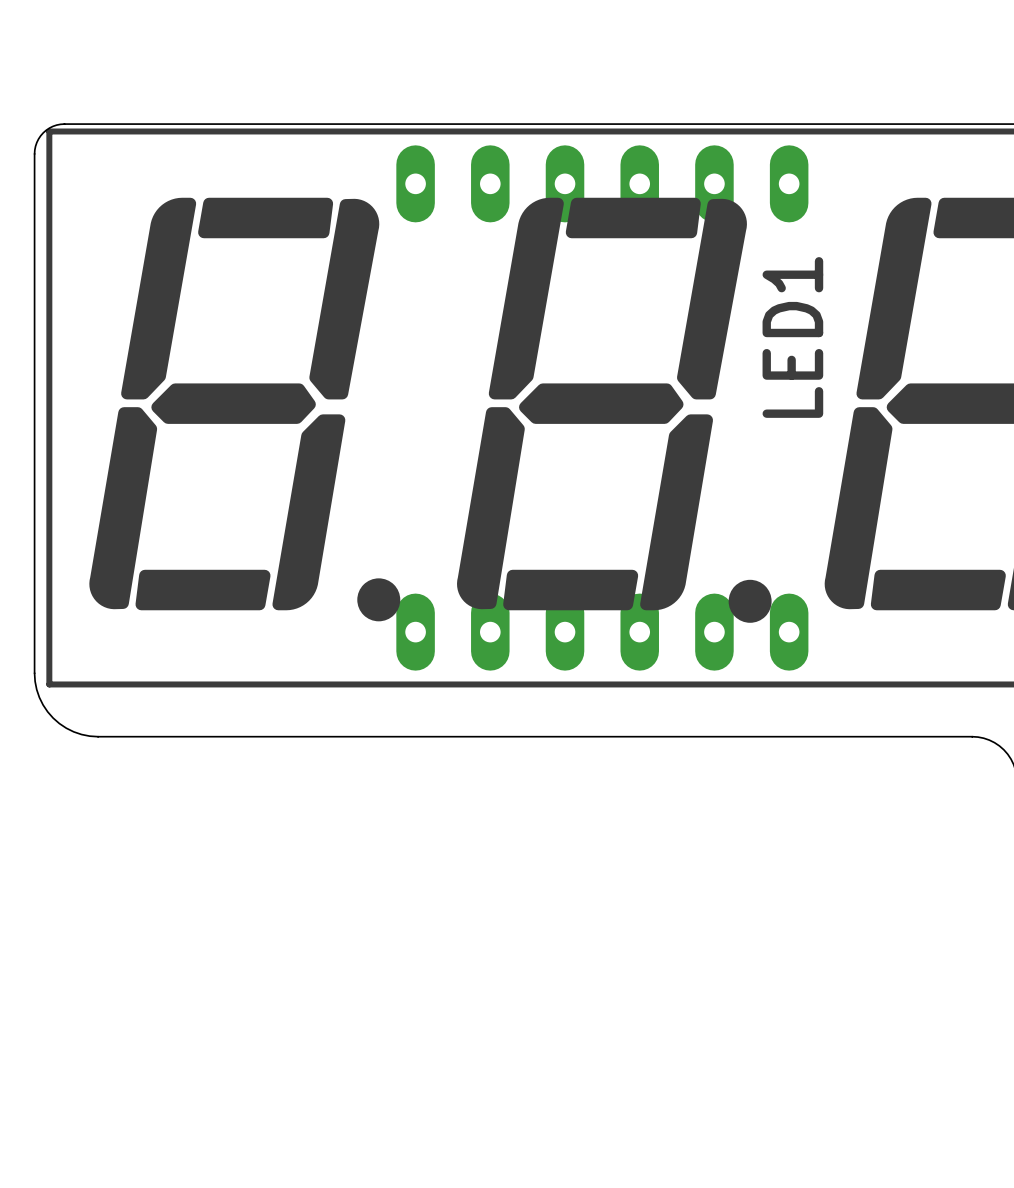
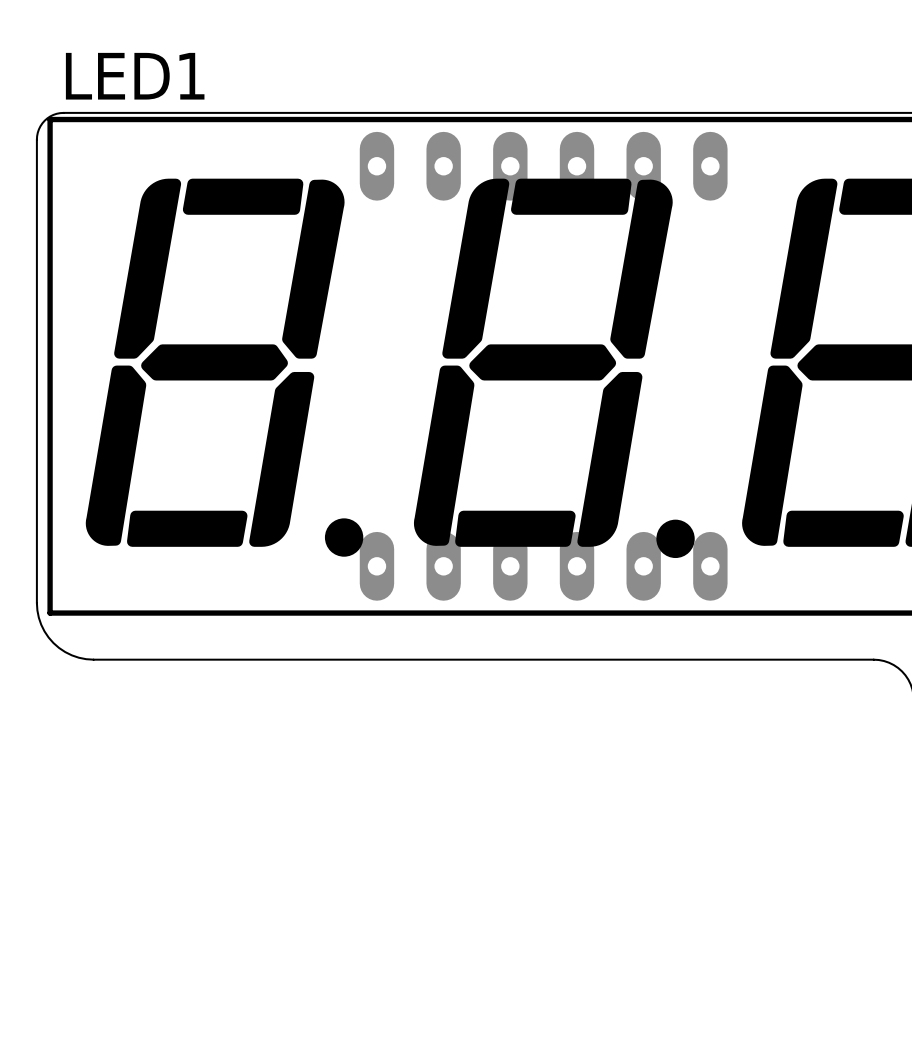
LED1 name rotation: 0° (792, 337) -> 90° clockwise (135, 76)
LED1 name position: LED1 (792, 337) -> LED1 (135, 76)

